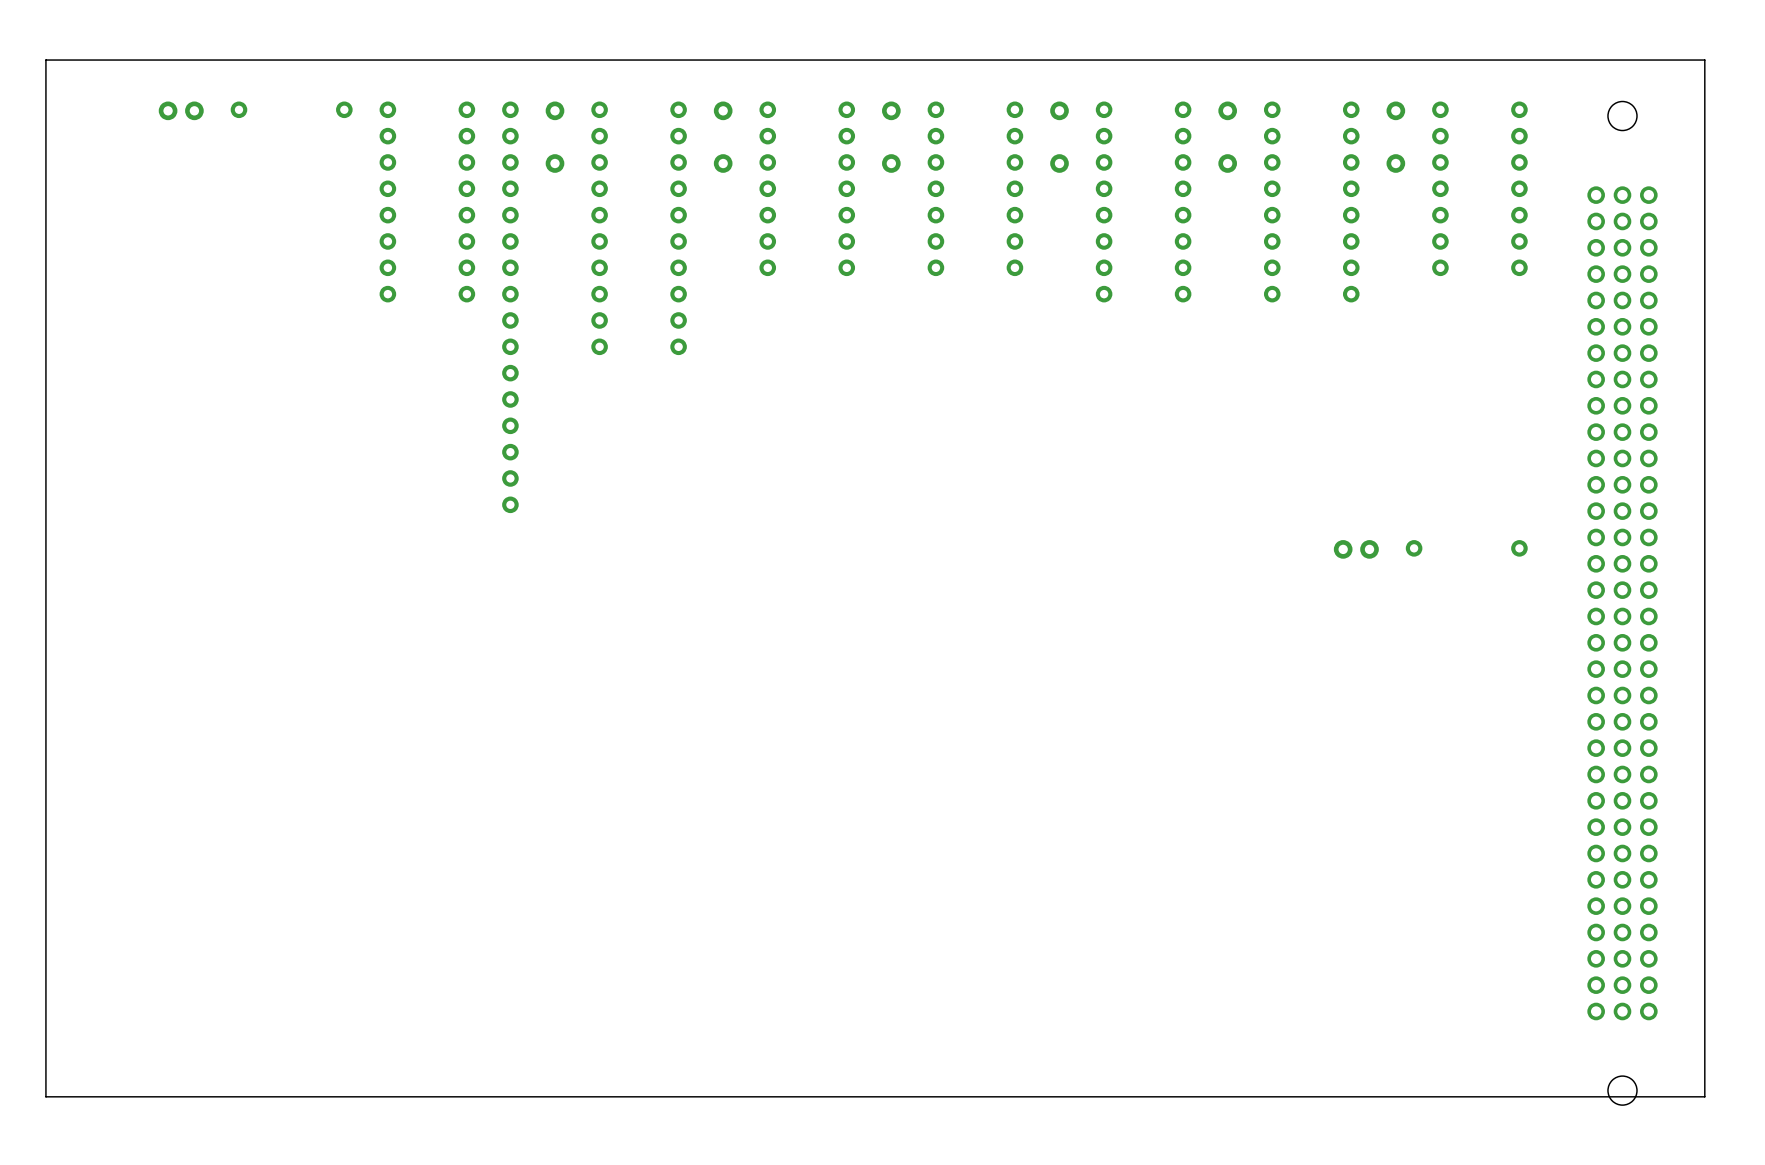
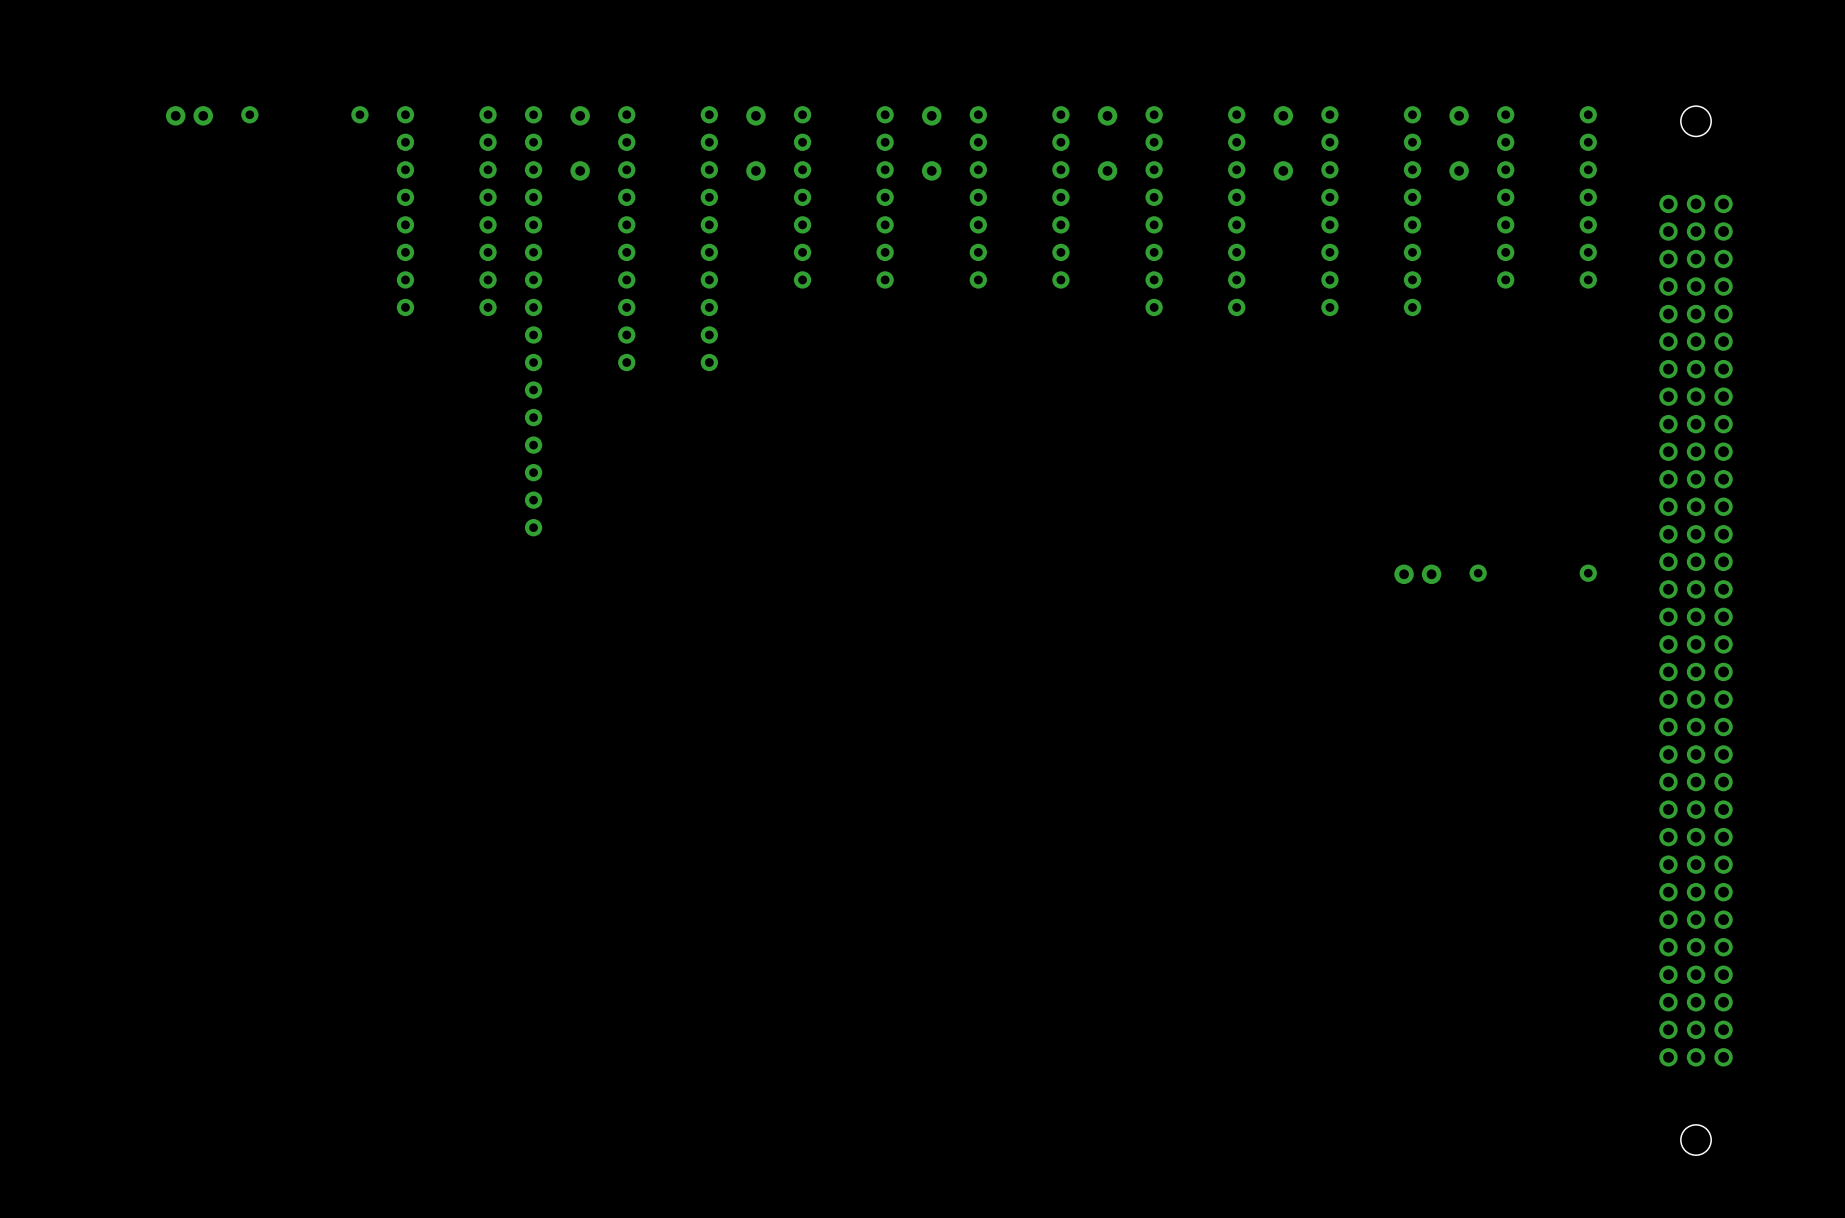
board edge: (1704, 60) (45, 60) (45, 1096) (1704, 1096) (1704, 60) -> none

